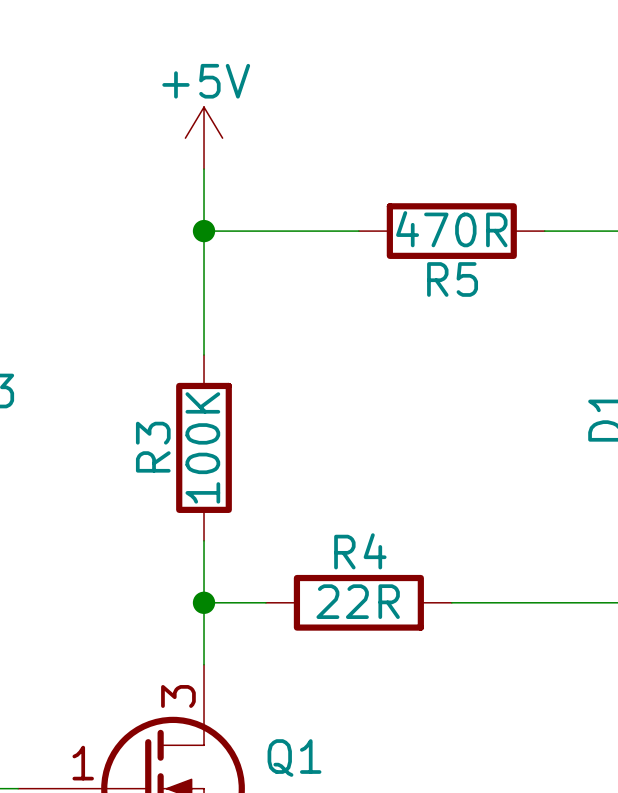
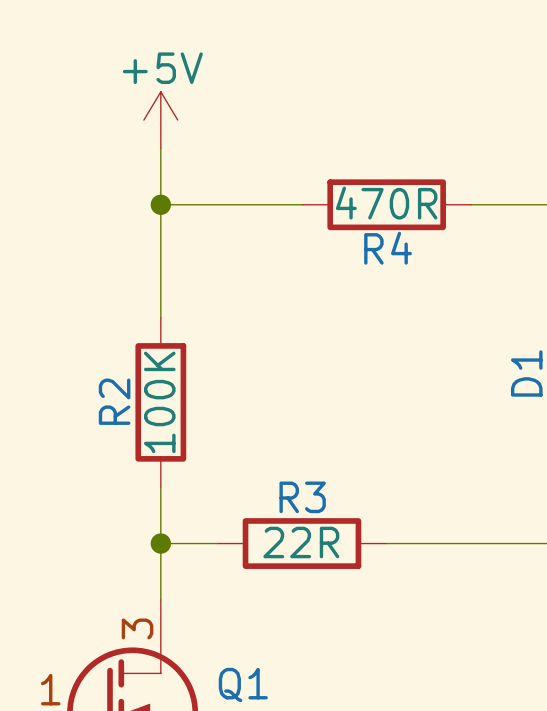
R5 name: R5 (452, 279) -> R4 (388, 248)
R3 name: R3 (153, 447) -> R2 (114, 401)
R4 name: R4 (360, 551) -> R3 (302, 497)

